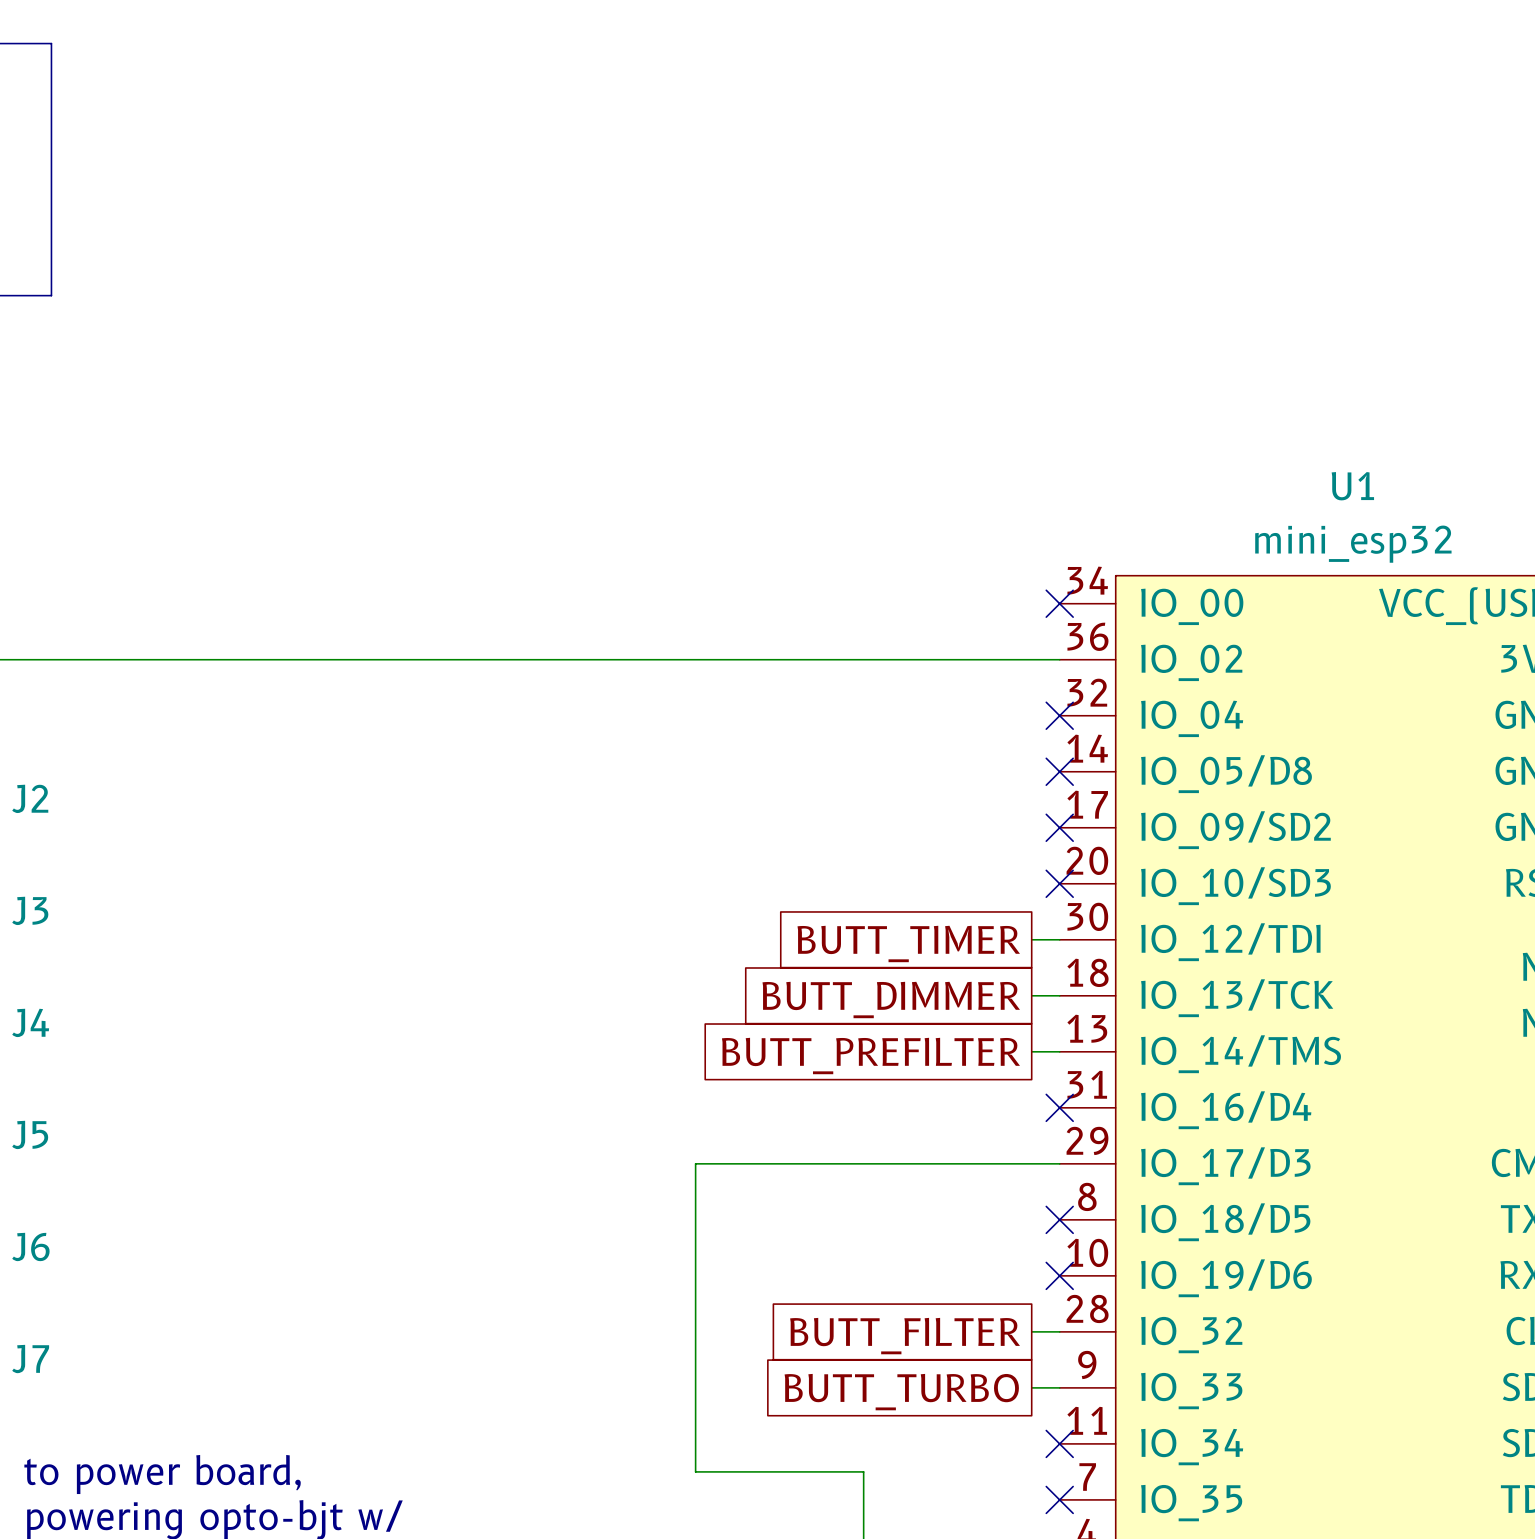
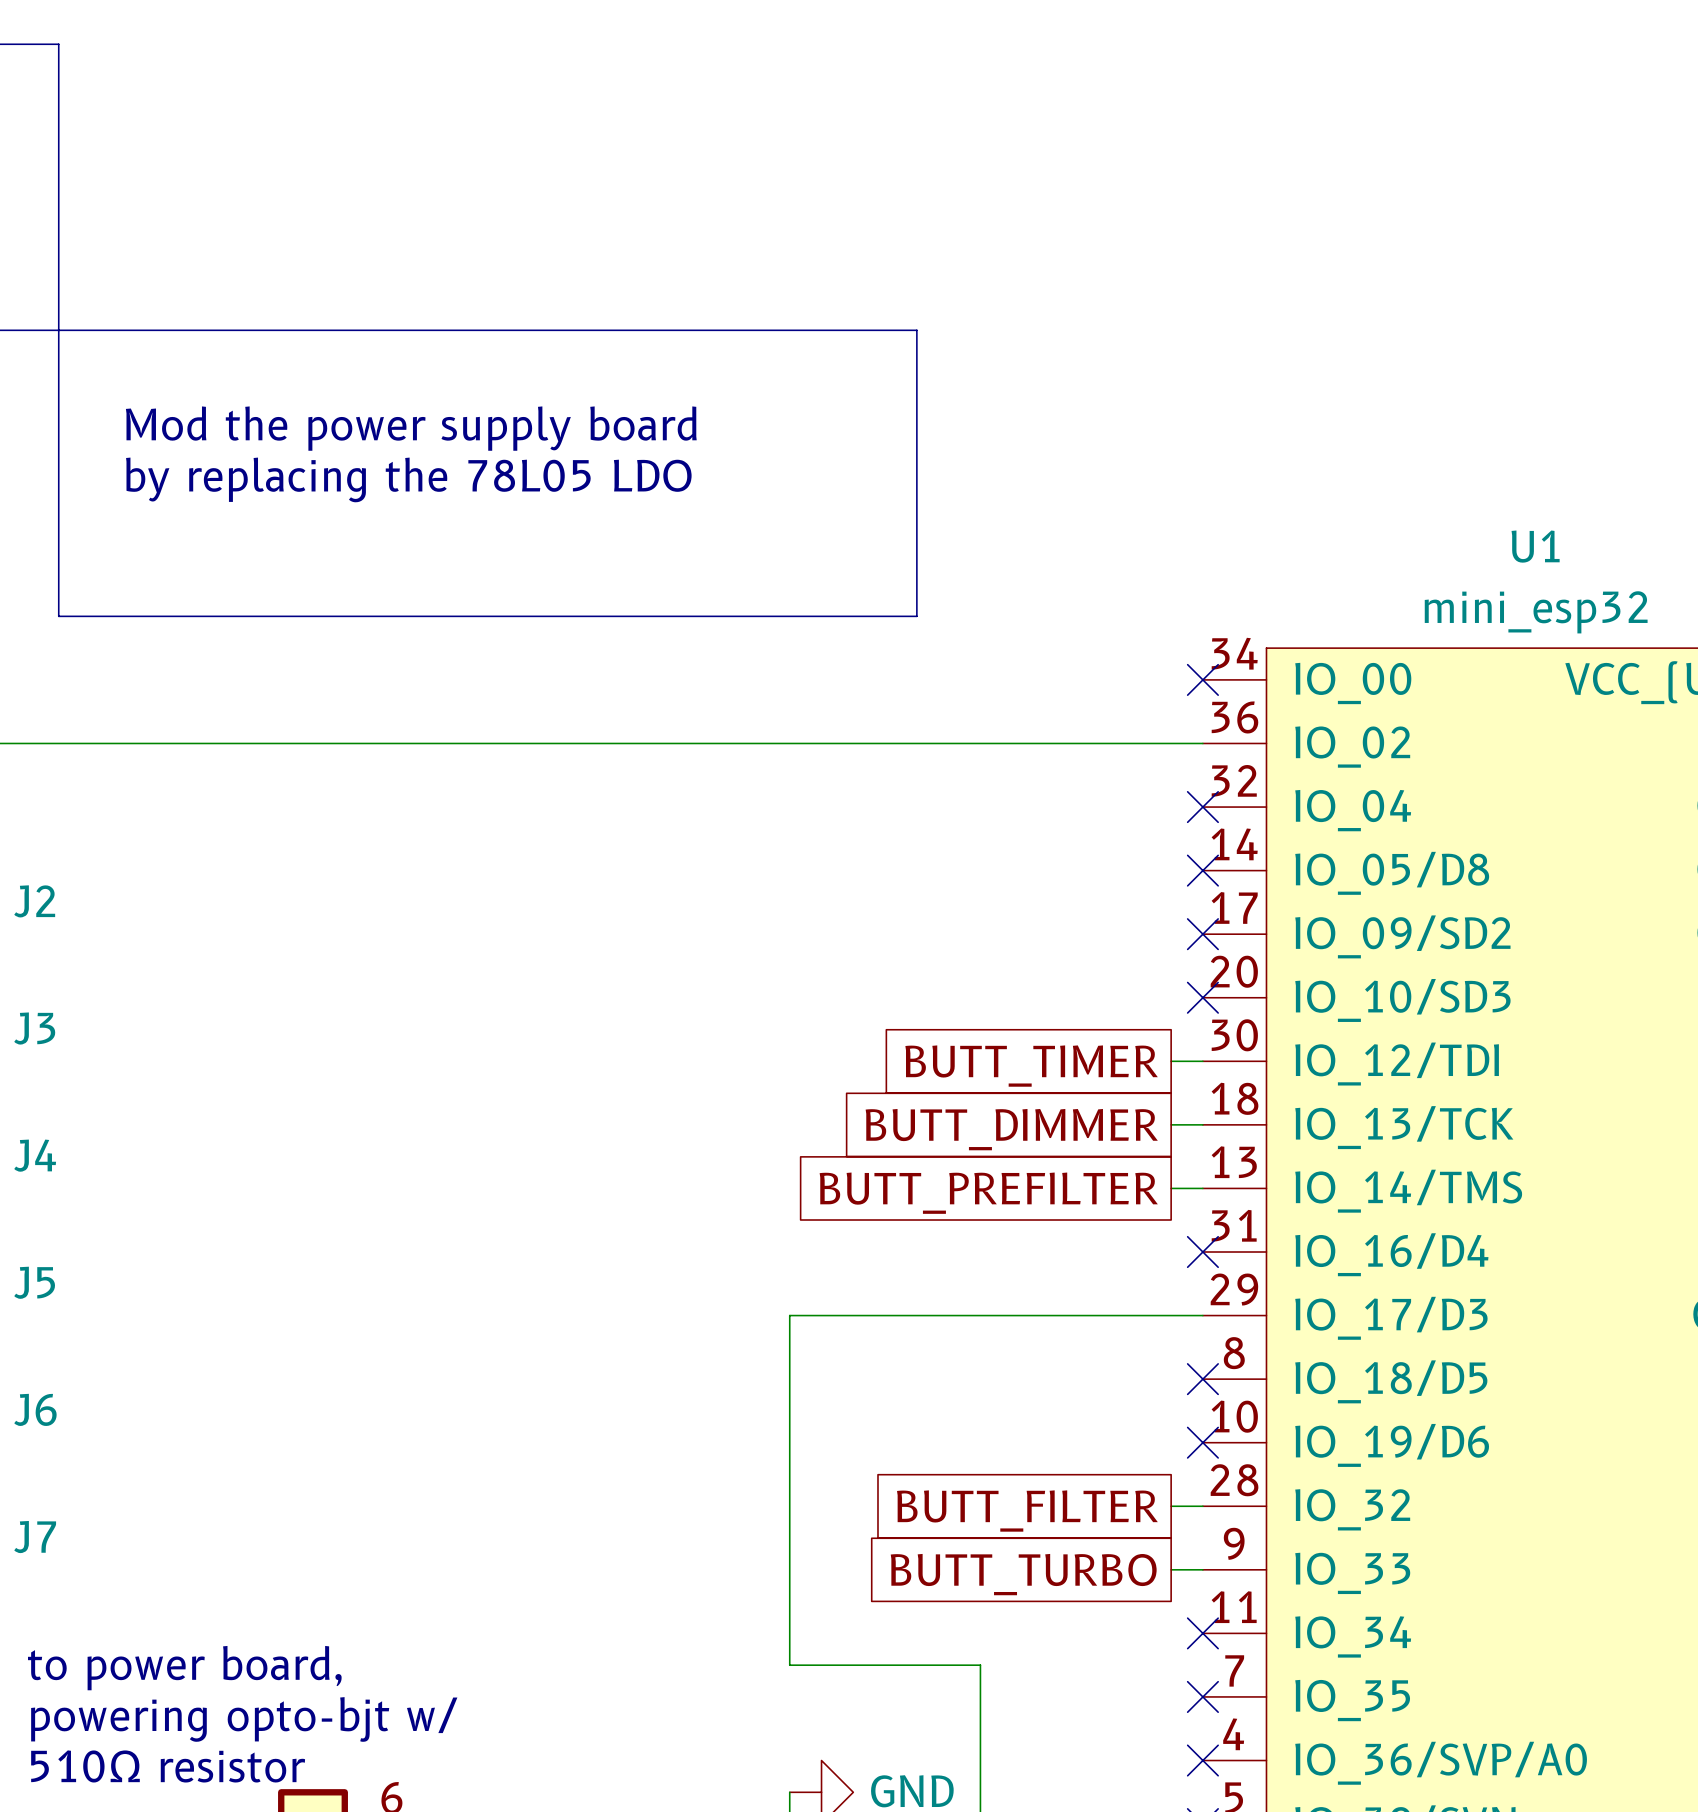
line: none -> (58, 330) (916, 330) (916, 616) (58, 616) (58, 330)
text: none -> Mod the power supply board (411, 428)
text: none -> by replacing the 78L05 LDO (408, 479)

